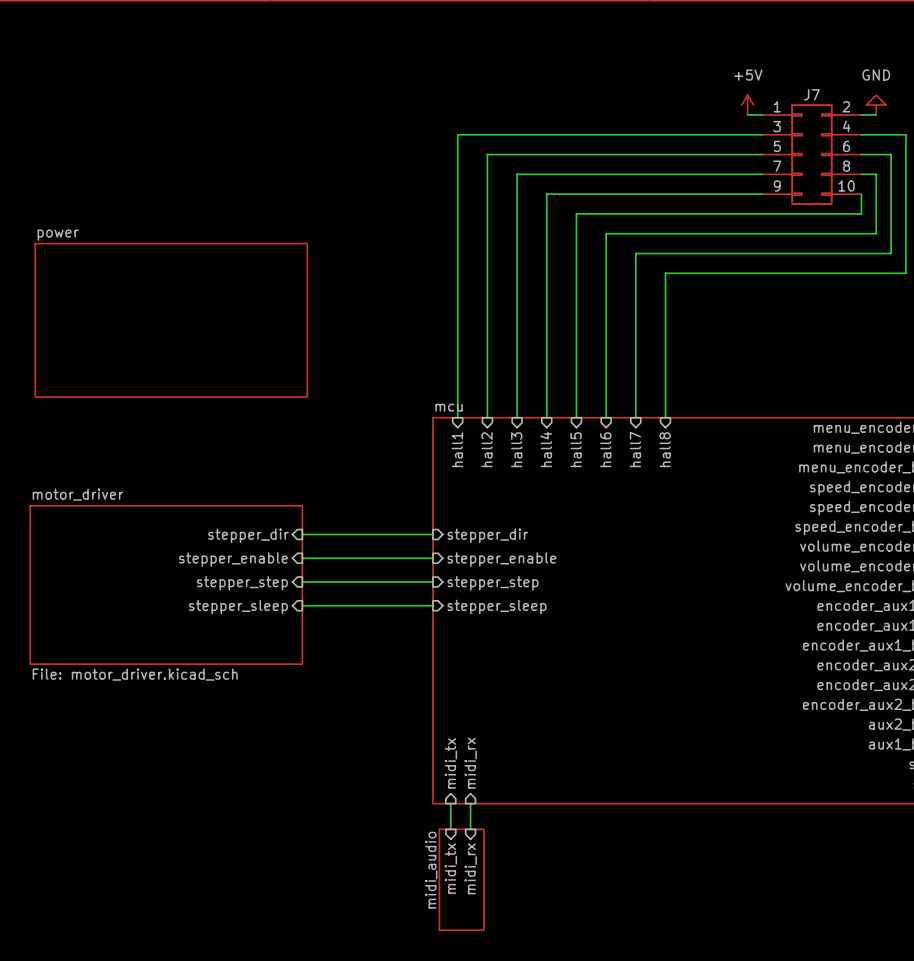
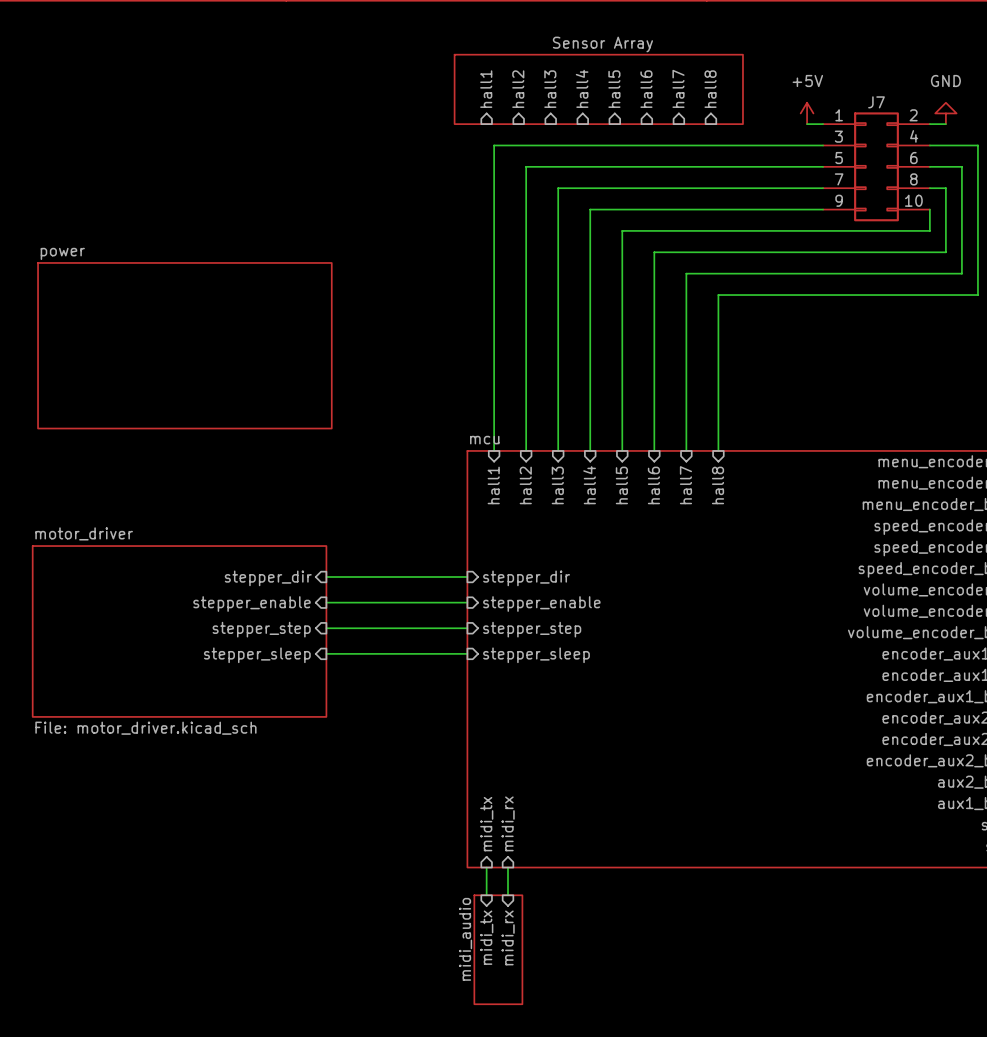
sheet pin: none -> hall1 (486, 89)
sheet pin: none -> hall2 (518, 89)
sheet pin: none -> hall3 (550, 89)
sheet pin: none -> hall4 (582, 88)
sheet Sensor Array: none -> (598, 89)
sheet pin: none -> hall5 (614, 89)
sheet pin: none -> hall6 (646, 89)
sheet pin: none -> hall7 (678, 88)
sheet pin: none -> hall8 (710, 89)

